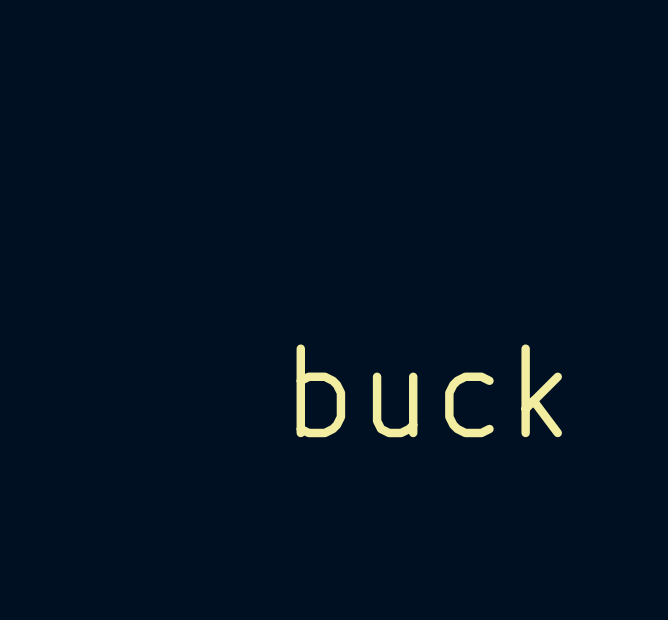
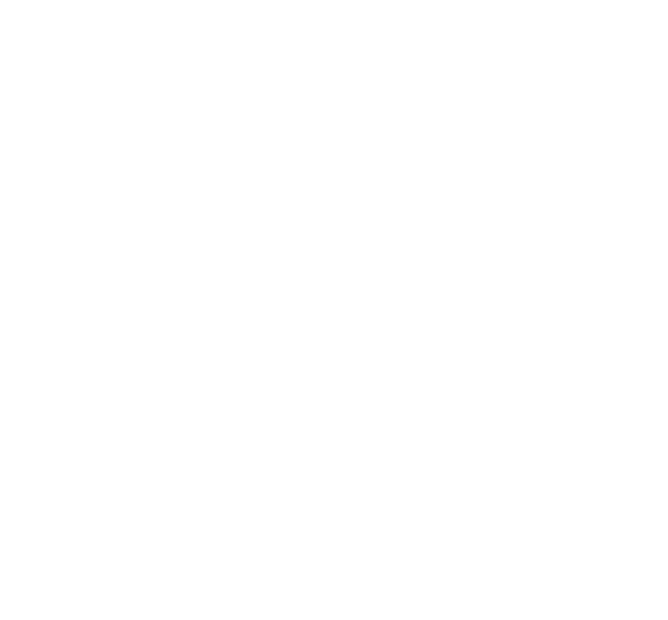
text: buck (429, 390) -> none

